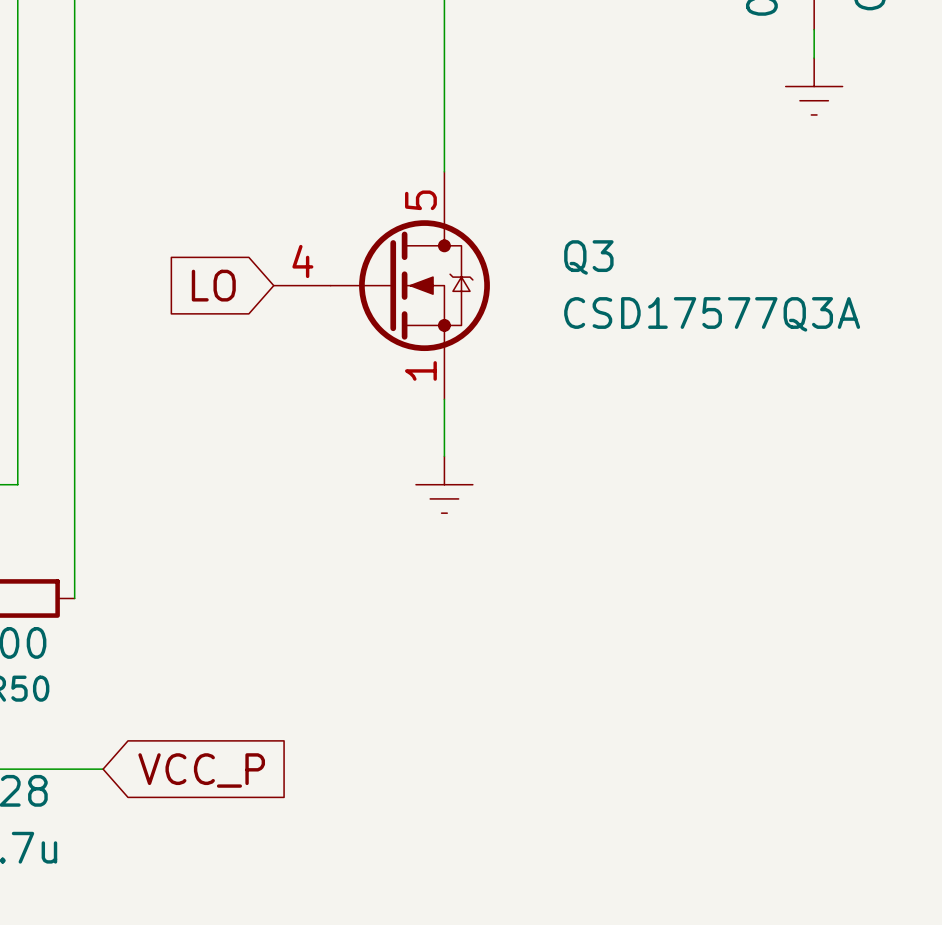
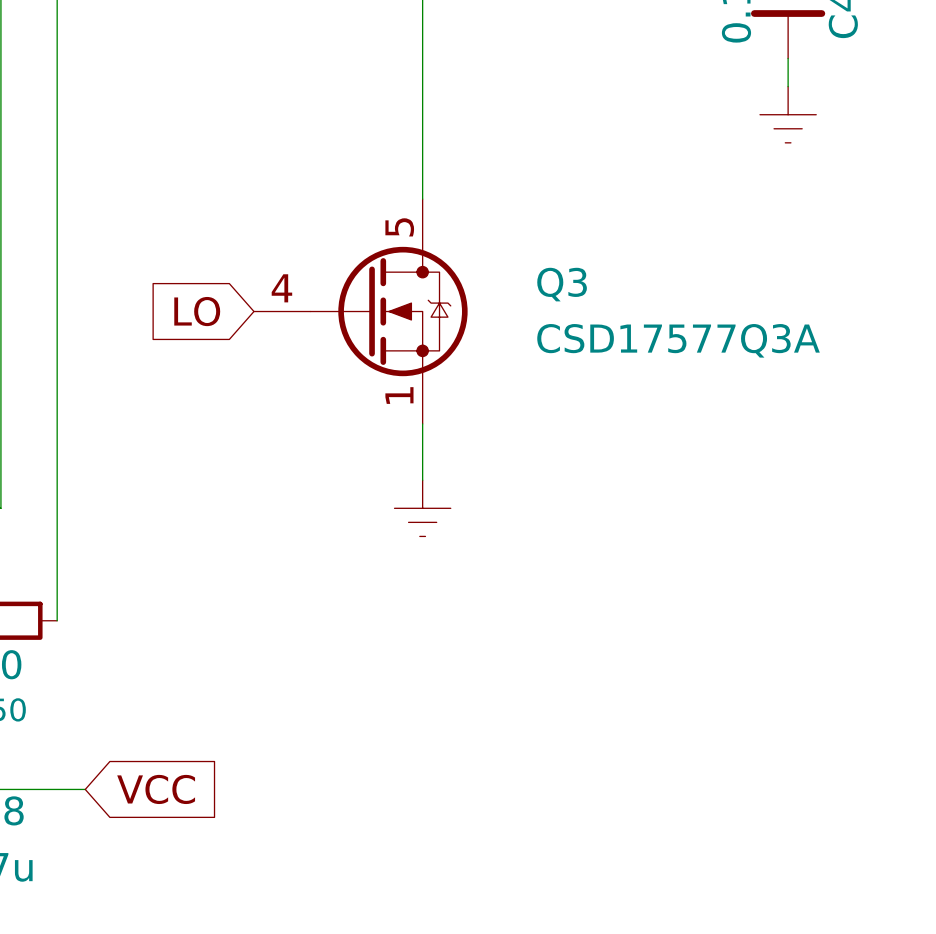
global label: VCC_P (201, 770) -> VCC (156, 789)

